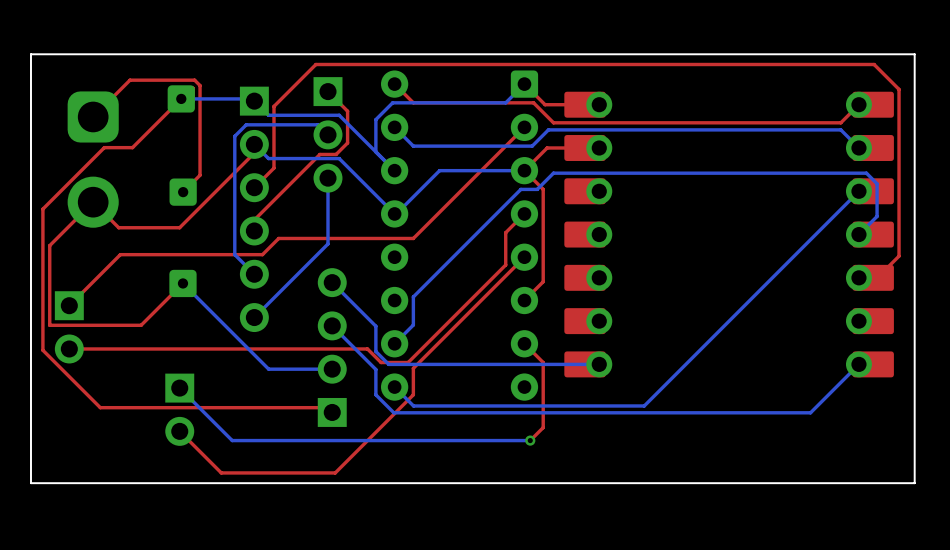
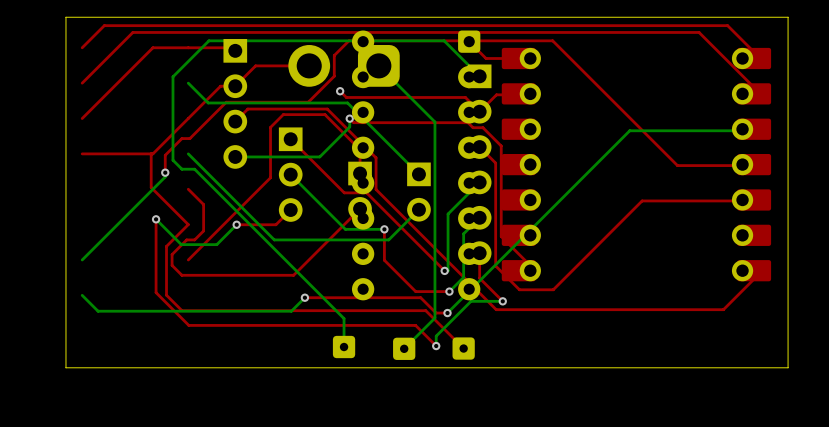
top track: (315, 64) (273, 106) (273, 168) (254, 187) -> (298, 25) (104, 25) (82, 47)
top track: (840, 64) (874, 64) (899, 89) (899, 256) (877, 277) (858, 277) -> (727, 25) (761, 59)
top track: (394, 84) (413, 102) (533, 102) (553, 122) (840, 122) (858, 104) -> none
bottom track: (524, 84) (505, 102) (392, 102) (375, 119) (375, 151) -> none
top track: (328, 91) (347, 111) (347, 142) (336, 154) (319, 154) (254, 219) (254, 230) -> none
top track: none -> (235, 50) (232, 47) (152, 47) (82, 118)
bottom track: (181, 98) (252, 98) (268, 115) (339, 115) (394, 170) -> none
part: (181, 98) -> none
top track: (193, 101) (191, 88) (132, 147) (104, 147) (42, 209) (42, 350) (100, 407) (327, 407) (332, 412) -> none
top track: none -> (309, 65) (255, 65) (235, 86) (220, 86) (152, 153) (82, 153)
bottom track: none -> (378, 65) (434, 122) (434, 318) (404, 348)
top track: (93, 116) (129, 80) (194, 80) (200, 85) (200, 175) (183, 192) -> none
bottom track: none -> (479, 76) (444, 40) (208, 40) (172, 76) (172, 160) (181, 169) (194, 169) (344, 318) (344, 347)
bottom track: (394, 127) (413, 146) (532, 146) (548, 129) (840, 129) (858, 147) -> none
top track: (524, 127) (413, 238) (278, 238) (262, 254) (120, 254) (69, 305) -> none
top track: none -> (82, 83) (132, 32) (699, 32) (761, 94)
bottom track: none -> (188, 83) (208, 102) (347, 102) (418, 174)
bottom track: (328, 134) (317, 124) (246, 124) (234, 136) (234, 254) (254, 274) -> none
part position: (328, 134) -> (290, 174)
top track: (254, 144) (254, 153) (179, 227) (118, 227) (93, 202) (49, 245) (49, 325) (141, 325) (182, 283) -> none
bottom track: (254, 144) (268, 158) (339, 158) (394, 213) (439, 170) (524, 170) -> none
top track: none -> (339, 90) (346, 97) (465, 97) (479, 111) (496, 94) (536, 94)
via: none -> (340, 91)
top track: (599, 147) (547, 147) (524, 170) (543, 189) (543, 281) (524, 300) -> none
part rotation: 0° (93, 159) -> 90° clockwise (344, 65)
part position: (93, 159) -> (344, 65)
bottom track: (328, 178) (328, 243) (254, 317) -> none
top track: none -> (349, 118) (353, 122) (468, 122) (473, 127) (482, 127) (501, 146) (501, 236) (536, 271)
bottom track: none -> (349, 118) (349, 127) (319, 156) (235, 156)
via: none -> (349, 118)
top track: none -> (235, 121) (247, 109) (327, 109) (376, 157) (376, 189) (496, 309) (723, 309) (761, 271)
bottom track: (858, 191) (644, 405) (413, 405) (394, 387) -> none
part: (183, 192) -> none
bottom track: none -> (736, 130) (629, 130) (447, 313)
top track: none -> (290, 139) (344, 192) (366, 192) (444, 270)
part position: (254, 209) -> (479, 164)
top track: (524, 213) (505, 232) (505, 264) (408, 362) (381, 362) (367, 348) (69, 348) -> none
top track: none -> (479, 147) (495, 163) (495, 265) (519, 289) (553, 289) (642, 200) (761, 200)
top track: none -> (151, 153) (151, 187) (188, 224) (166, 246) (166, 295) (181, 310) (425, 310) (463, 348)
bottom track: none -> (188, 153) (274, 239) (388, 239) (418, 209)
bottom track: (858, 234) (877, 216) (877, 183) (866, 173) (553, 173) (537, 189) (520, 189) (413, 296) (413, 325) (394, 343) -> none
top track: none -> (761, 165) (677, 165) (552, 40) (348, 40) (334, 55) (334, 76) (308, 102) (226, 102) (189, 138) (181, 138) (165, 155) (165, 172)
bottom track: none -> (165, 172) (165, 176) (82, 259)
via: none -> (165, 172)
top track: none -> (360, 173) (360, 149) (324, 114) (283, 114) (270, 127) (270, 177) (188, 259)
bottom track: none -> (290, 174) (345, 229) (384, 229)
bottom track: none -> (479, 182) (448, 214) (448, 270) (444, 270)
top track: (524, 257) (413, 368) (413, 394) (335, 472) (221, 472) (179, 431) -> none
top track: none -> (188, 189) (203, 204) (203, 230) (194, 239) (186, 239) (172, 254) (172, 265) (181, 275) (293, 275) (360, 208)
part: none -> (360, 191)
part: none -> (418, 192)
bottom track: (332, 282) (375, 326) (375, 351) (388, 364) (599, 364) -> none
bottom track: (182, 283) (268, 369) (332, 369) -> none
part: (182, 283) -> none
top track: none -> (290, 210) (275, 224) (236, 224)
bottom track: none -> (479, 217) (463, 233) (463, 277) (449, 291)
top track: none -> (156, 219) (156, 292) (188, 325) (415, 325) (436, 346)
bottom track: none -> (156, 219) (181, 244) (216, 244) (236, 224)
via: none -> (156, 219)
via: none -> (236, 224)
top track: none -> (384, 228) (384, 260) (415, 291) (449, 291)
via: none -> (384, 229)
bottom track: (332, 325) (375, 369) (375, 394) (393, 412) (810, 412) (858, 364) -> none
part: (69, 327) -> none
top track: none -> (479, 253) (479, 278) (502, 301)
top track: (524, 343) (543, 362) (543, 427) (530, 440) -> none
part rotation: 0° (332, 347) -> 180° (235, 103)
part position: (332, 347) -> (235, 103)
via: none -> (444, 270)
bottom track: (179, 388) (232, 440) (530, 440) -> none
via: none -> (449, 291)
bottom track: none -> (82, 295) (98, 311) (291, 311) (304, 297)
top track: none -> (304, 297) (420, 297) (436, 313) (447, 313)
via: none -> (304, 297)
bottom track: none -> (502, 301) (471, 301) (436, 336) (436, 346)
via: none -> (502, 301)
part: (179, 409) -> none
via: none -> (447, 313)
via: (530, 440) -> none
via: none -> (436, 346)
part: none -> (344, 347)
part: none -> (463, 348)
part: none -> (404, 348)

